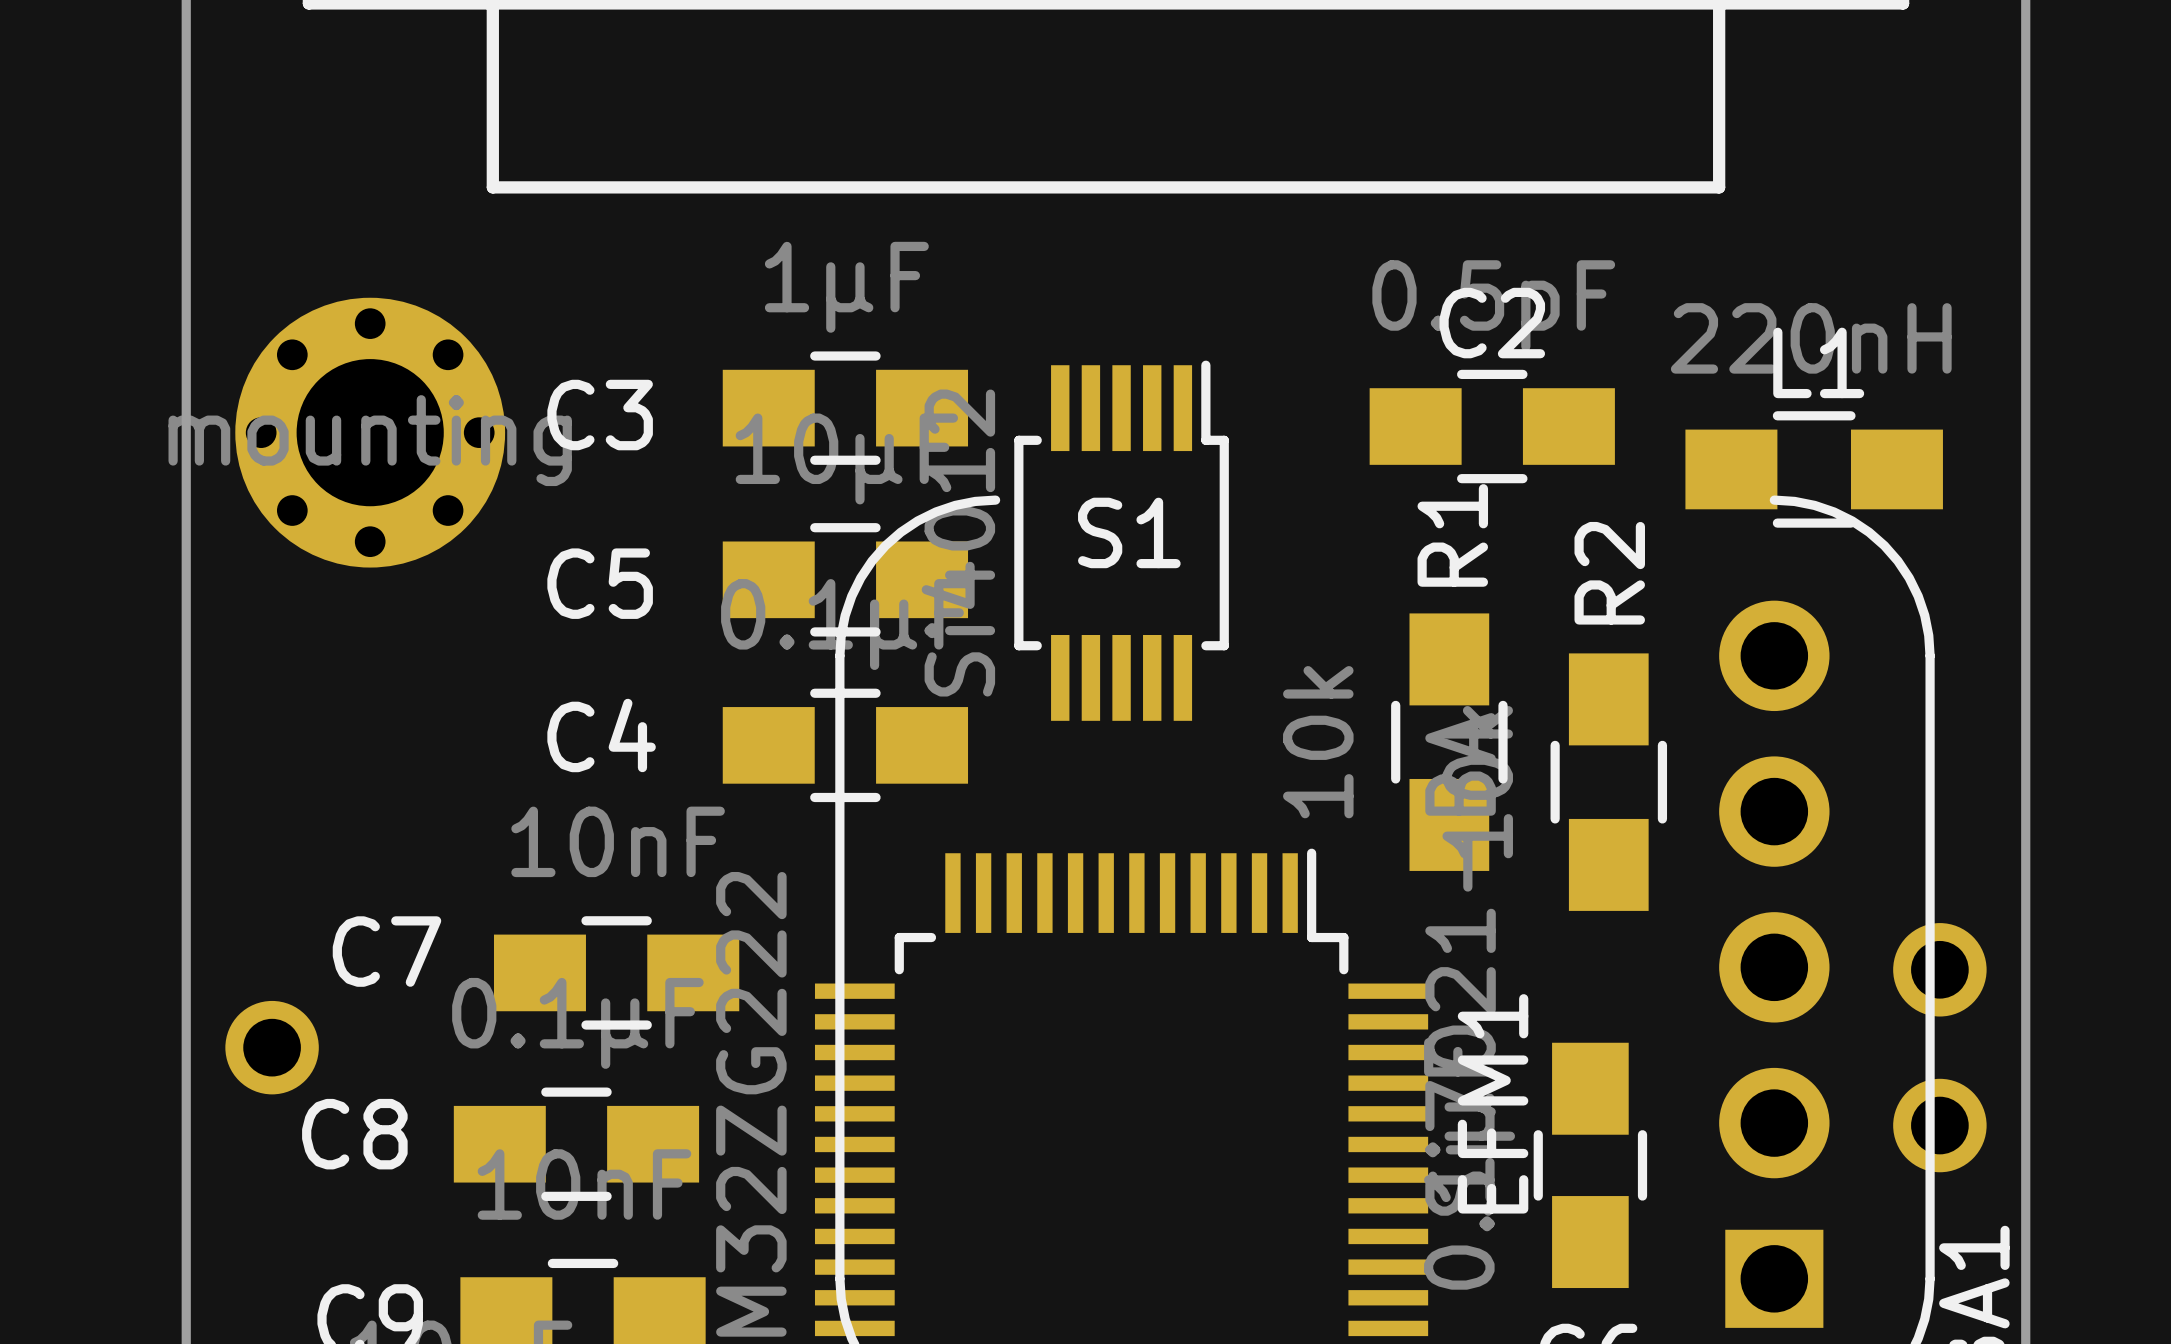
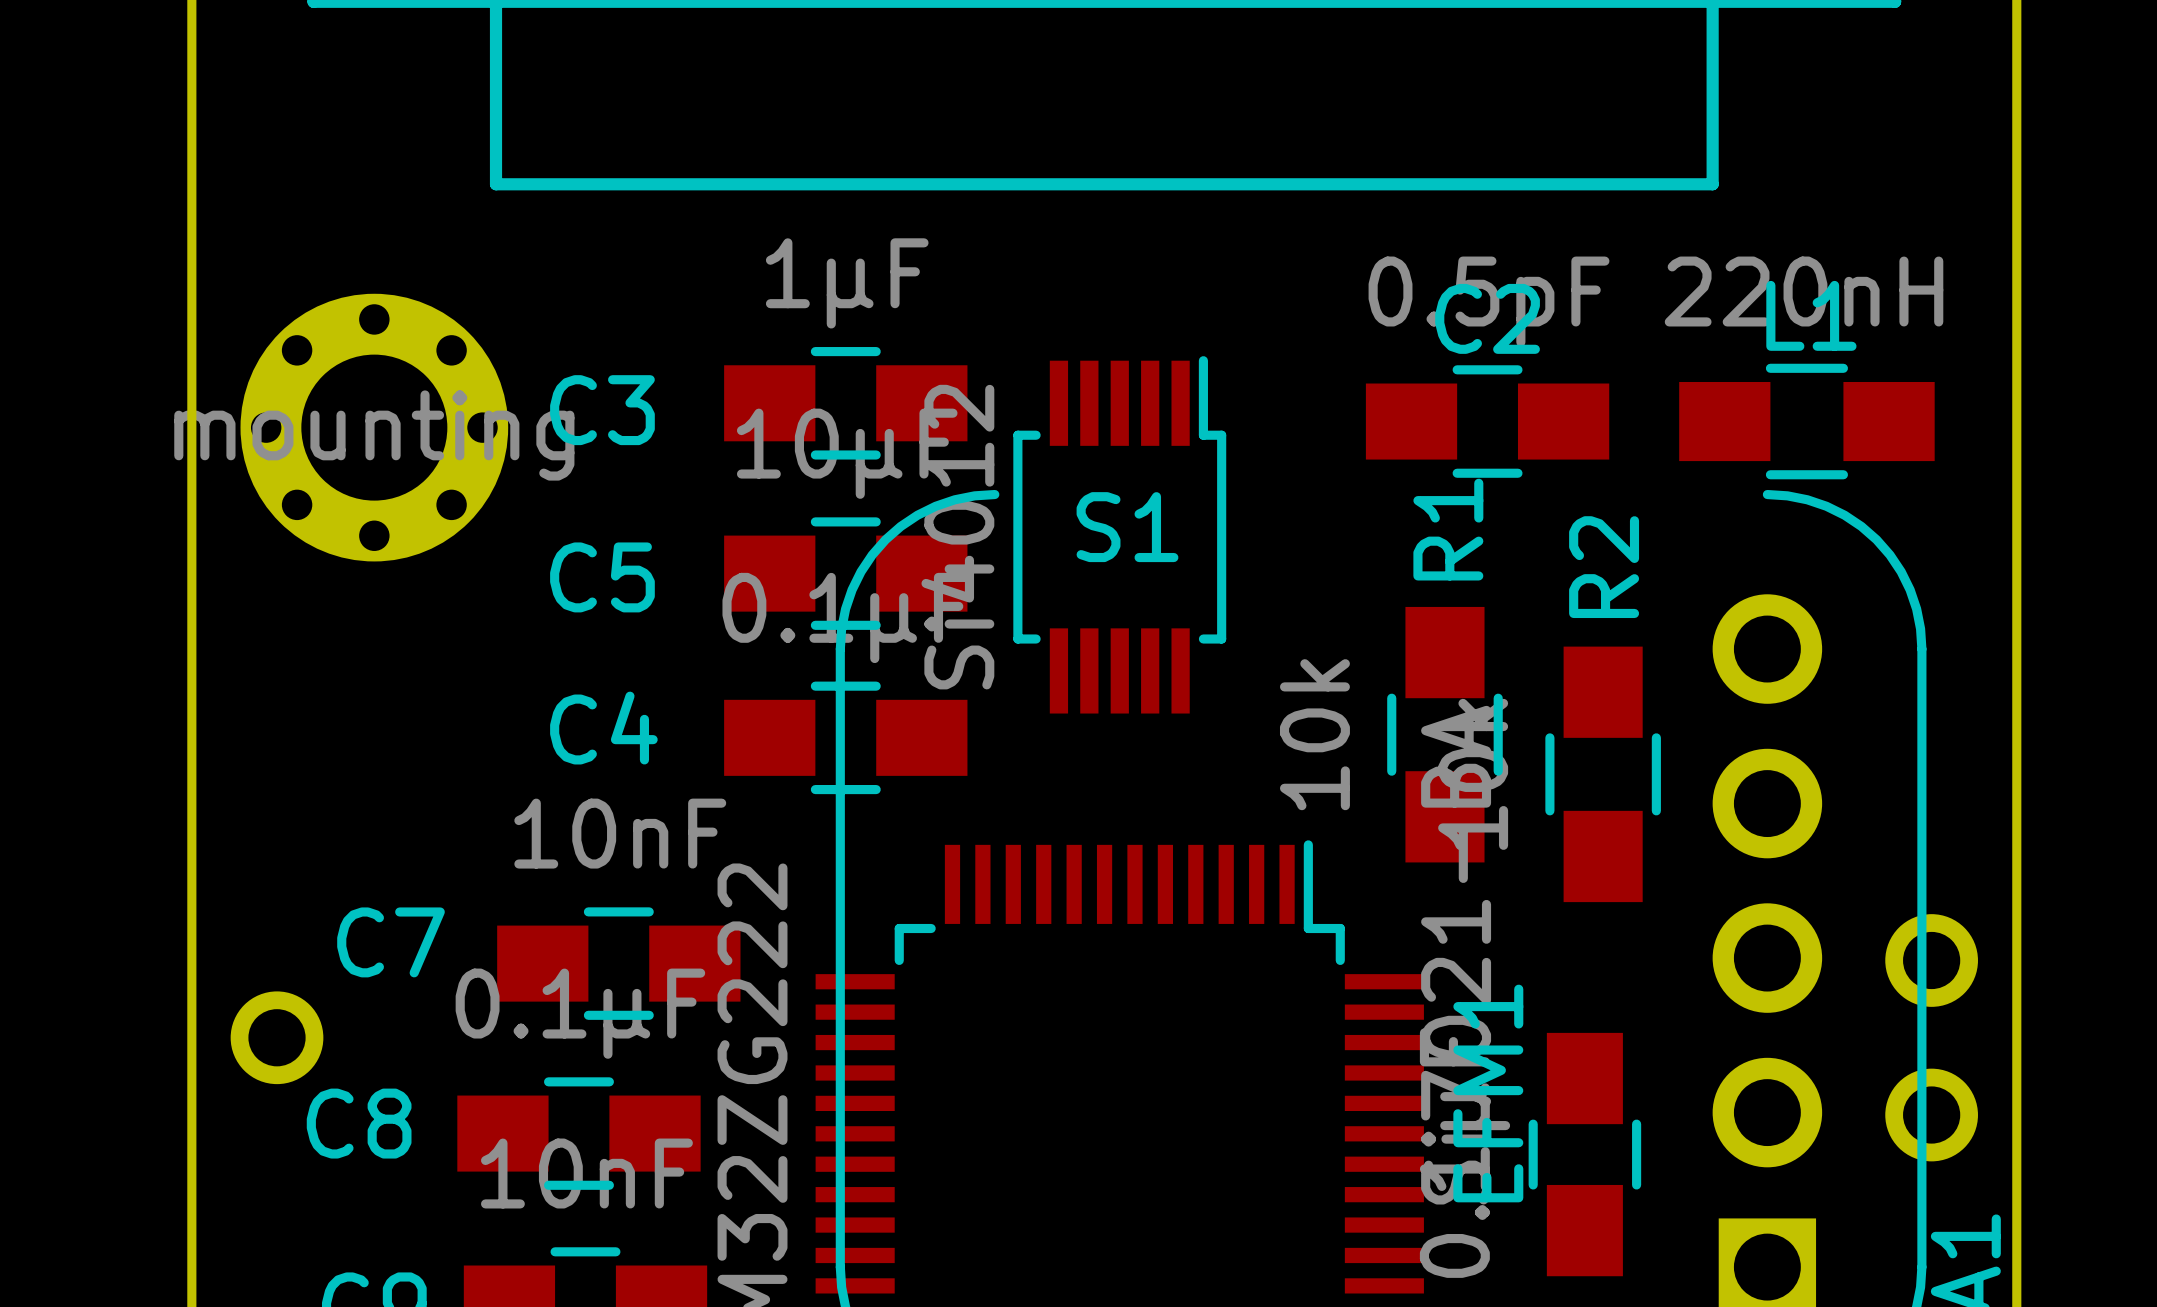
L1 position: (1814, 469) -> (1806, 421)

